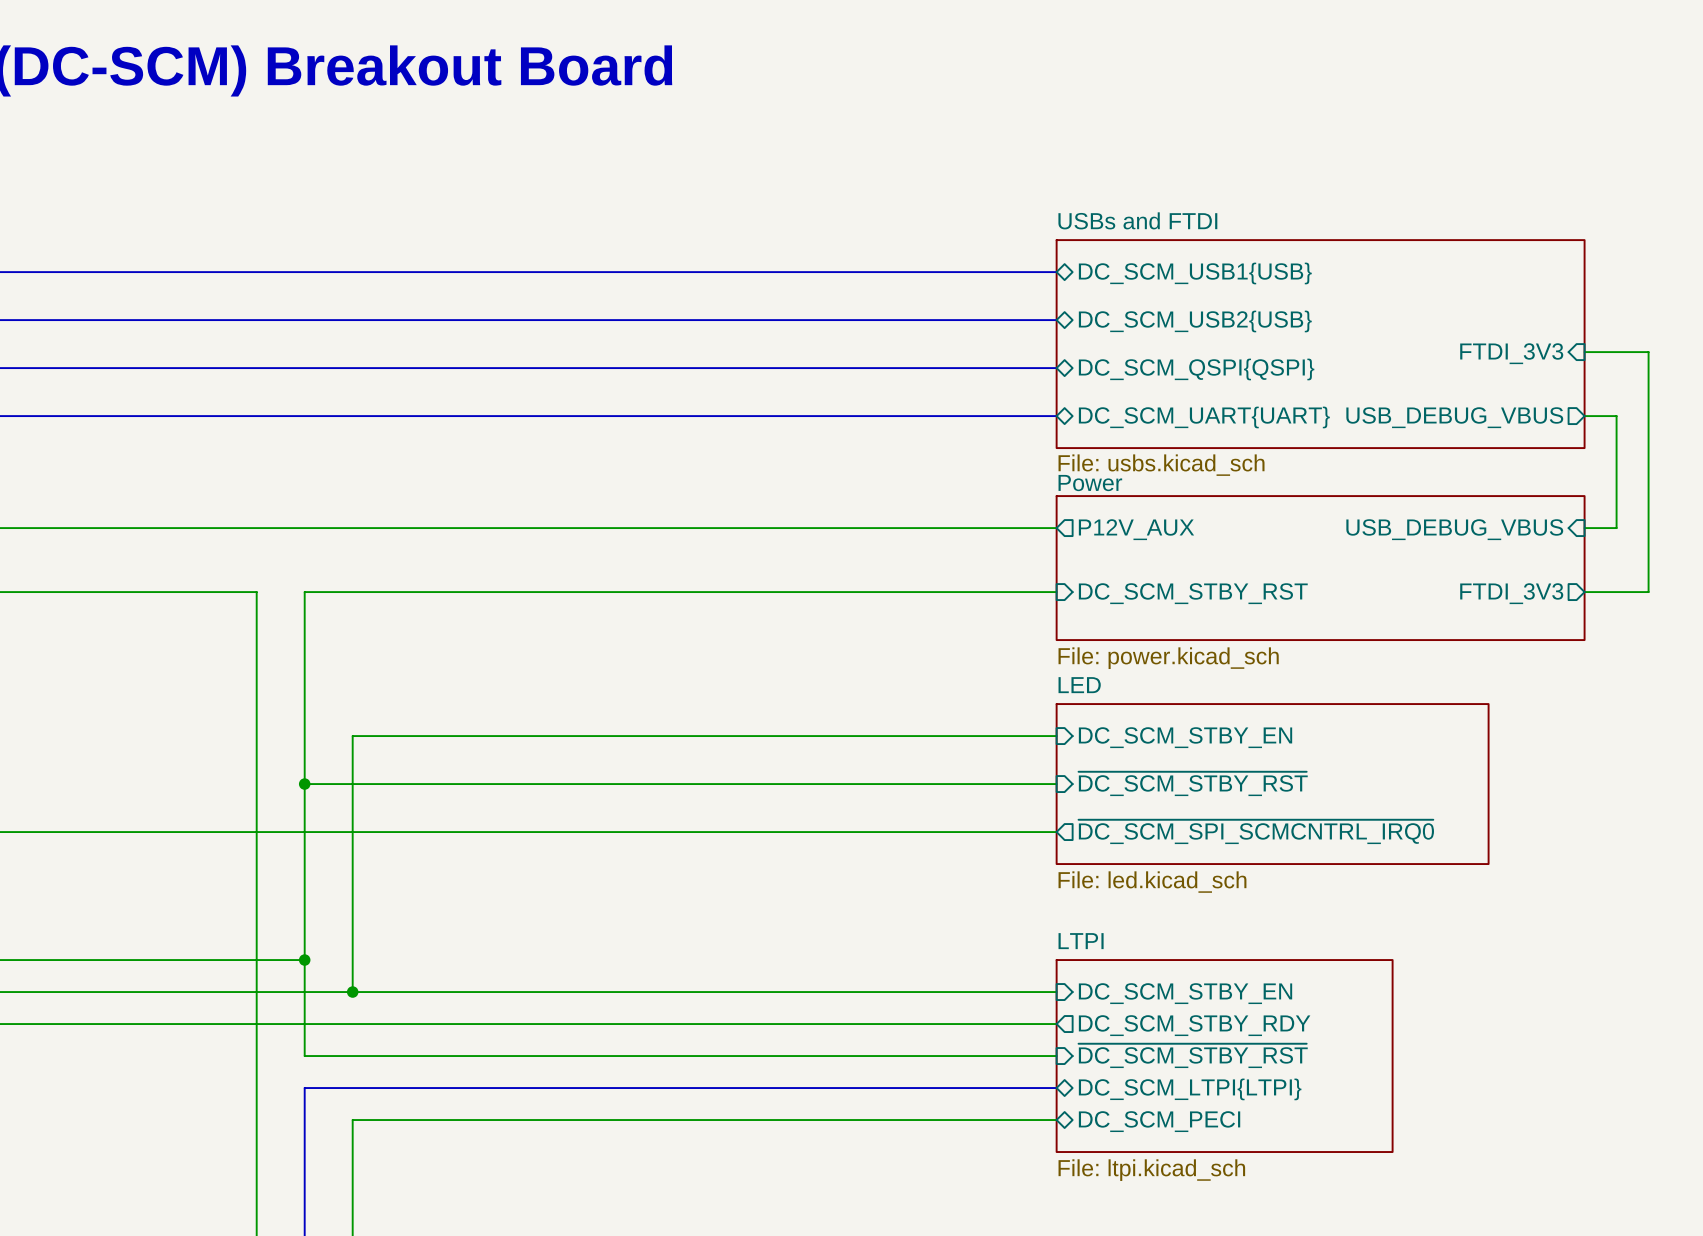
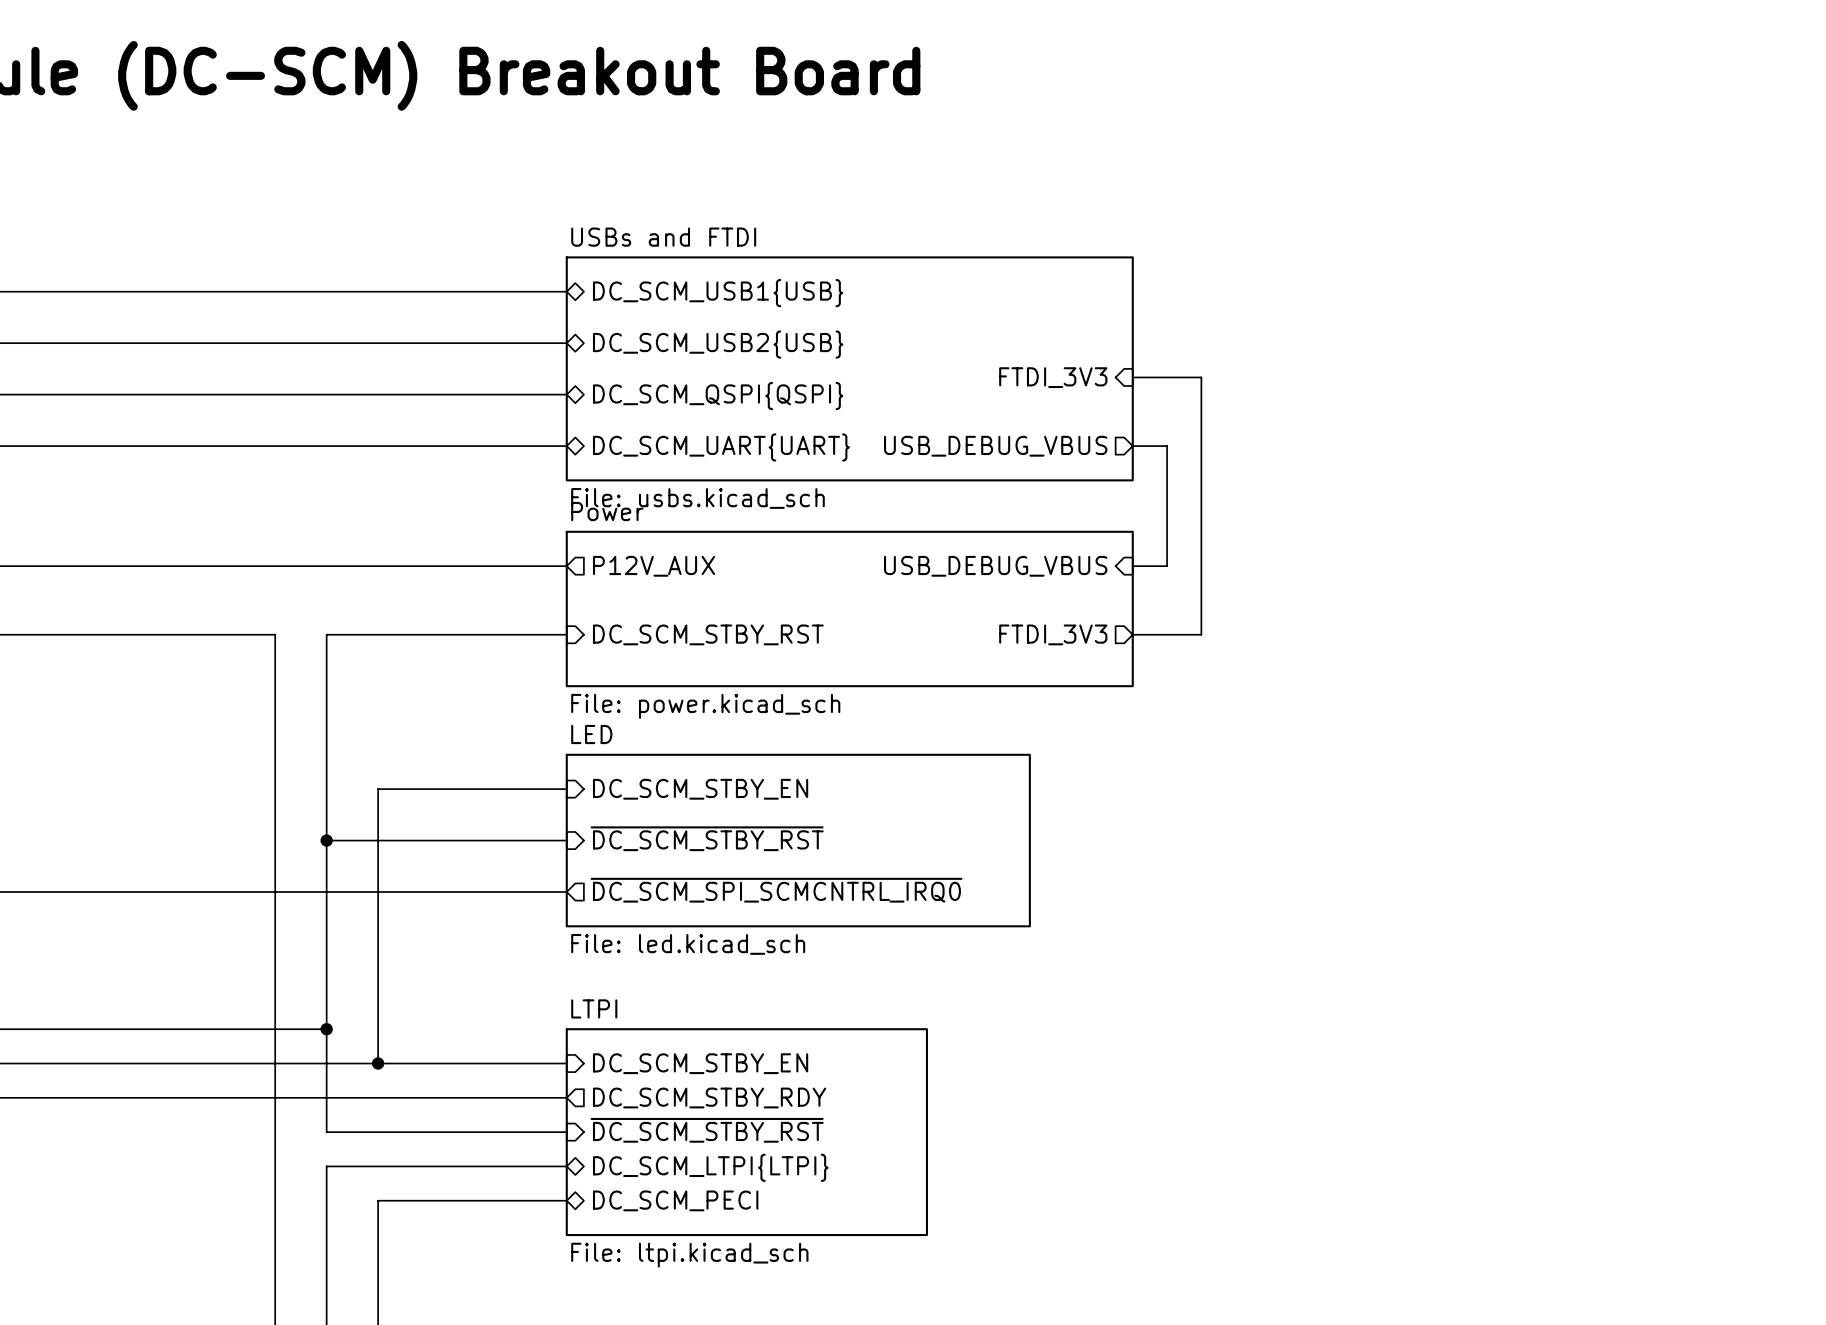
bus: (528, 272) (1056, 272) -> none
sheet pin: none -> DC_SCM_USB1{USB} (718, 293)
sheet pin: DC_SCM_USB1{USB} (1195, 273) -> none
bus: (528, 320) (1056, 320) -> none
sheet pin: none -> DC_SCM_USB2{USB} (718, 344)
sheet pin: DC_SCM_USB2{USB} (1195, 321) -> none
sheet USBs and FTDI: none -> File: usbs.kicad_sch (849, 368)
sheet USBs and FTDI: File: usbs.kicad_sch (1320, 344) -> none
wire: (1584, 352) (1648, 352) (1648, 592) (1584, 592) -> none
sheet pin: none -> FTDI_3V3 (1053, 377)
sheet pin: FTDI_3V3 (1511, 353) -> none
bus: (528, 368) (1056, 368) -> none
sheet pin: none -> DC_SCM_QSPI{QSPI} (718, 396)
sheet pin: DC_SCM_QSPI{QSPI} (1196, 369) -> none
bus: (528, 416) (1056, 416) -> none
wire: (1584, 416) (1616, 416) (1616, 528) (1584, 528) -> none
sheet pin: none -> DC_SCM_UART{UART} (721, 447)
sheet pin: none -> USB_DEBUG_VBUS (995, 446)
sheet pin: DC_SCM_UART{UART} (1204, 417) -> none
sheet pin: USB_DEBUG_VBUS (1454, 417) -> none
wire: (528, 528) (1056, 528) -> (1132, 446) (1167, 446) (1167, 566) (1132, 566)
sheet pin: none -> P12V_AUX (654, 566)
sheet pin: none -> USB_DEBUG_VBUS (995, 566)
sheet pin: P12V_AUX (1136, 529) -> none
sheet pin: USB_DEBUG_VBUS (1454, 529) -> none
sheet Power: none -> File: power.kicad_sch (849, 609)
sheet Power: File: power.kicad_sch (1320, 568) -> none
wire: (528, 592) (1056, 592) -> (1132, 377) (1201, 377) (1201, 634) (1132, 634)
sheet pin: none -> DC_SCM_STBY_RST (708, 634)
sheet pin: none -> FTDI_3V3 (1053, 634)
sheet pin: DC_SCM_STBY_RST (1193, 593) -> none
sheet pin: FTDI_3V3 (1511, 593) -> none
wire: (528, 736) (1056, 736) -> none
sheet pin: none -> DC_SCM_STBY_EN (700, 789)
sheet pin: DC_SCM_STBY_EN (1185, 737) -> none
sheet pin: none -> ~{DC_SCM_STBY_RST} (707, 838)
sheet pin: ~{DC_SCM_STBY_RST} (1193, 783) -> none
wire: (528, 784) (1056, 784) -> none
sheet LED: none -> File: led.kicad_sch (798, 840)
sheet LED: File: led.kicad_sch (1272, 784) -> none
sheet pin: none -> ~{DC_SCM_SPI_SCMCNTRL_IRQ0} (776, 890)
sheet pin: ~{DC_SCM_SPI_SCMCNTRL_IRQ0} (1256, 831) -> none
wire: (528, 832) (1056, 832) -> none
wire: (528, 992) (1056, 992) -> none
sheet pin: none -> DC_SCM_STBY_EN (700, 1063)
sheet pin: DC_SCM_STBY_EN (1185, 993) -> none
wire: (528, 1024) (1056, 1024) -> none
sheet pin: none -> DC_SCM_STBY_RDY (709, 1097)
sheet pin: DC_SCM_STBY_RDY (1194, 1025) -> none
sheet pin: none -> ~{DC_SCM_STBY_RST} (707, 1130)
sheet pin: ~{DC_SCM_STBY_RST} (1193, 1055) -> none
wire: (528, 1056) (1056, 1056) -> none
sheet LTPI: none -> File: ltpi.kicad_sch (746, 1132)
sheet LTPI: File: ltpi.kicad_sch (1224, 1056) -> none
bus: (528, 1088) (1056, 1088) -> none
sheet pin: none -> DC_SCM_LTPI{LTPI} (710, 1167)
sheet pin: DC_SCM_LTPI{LTPI} (1190, 1089) -> none
wire: (528, 1120) (1056, 1120) -> none
sheet pin: none -> DC_SCM_PECI (675, 1200)
sheet pin: DC_SCM_PECI (1159, 1121) -> none

